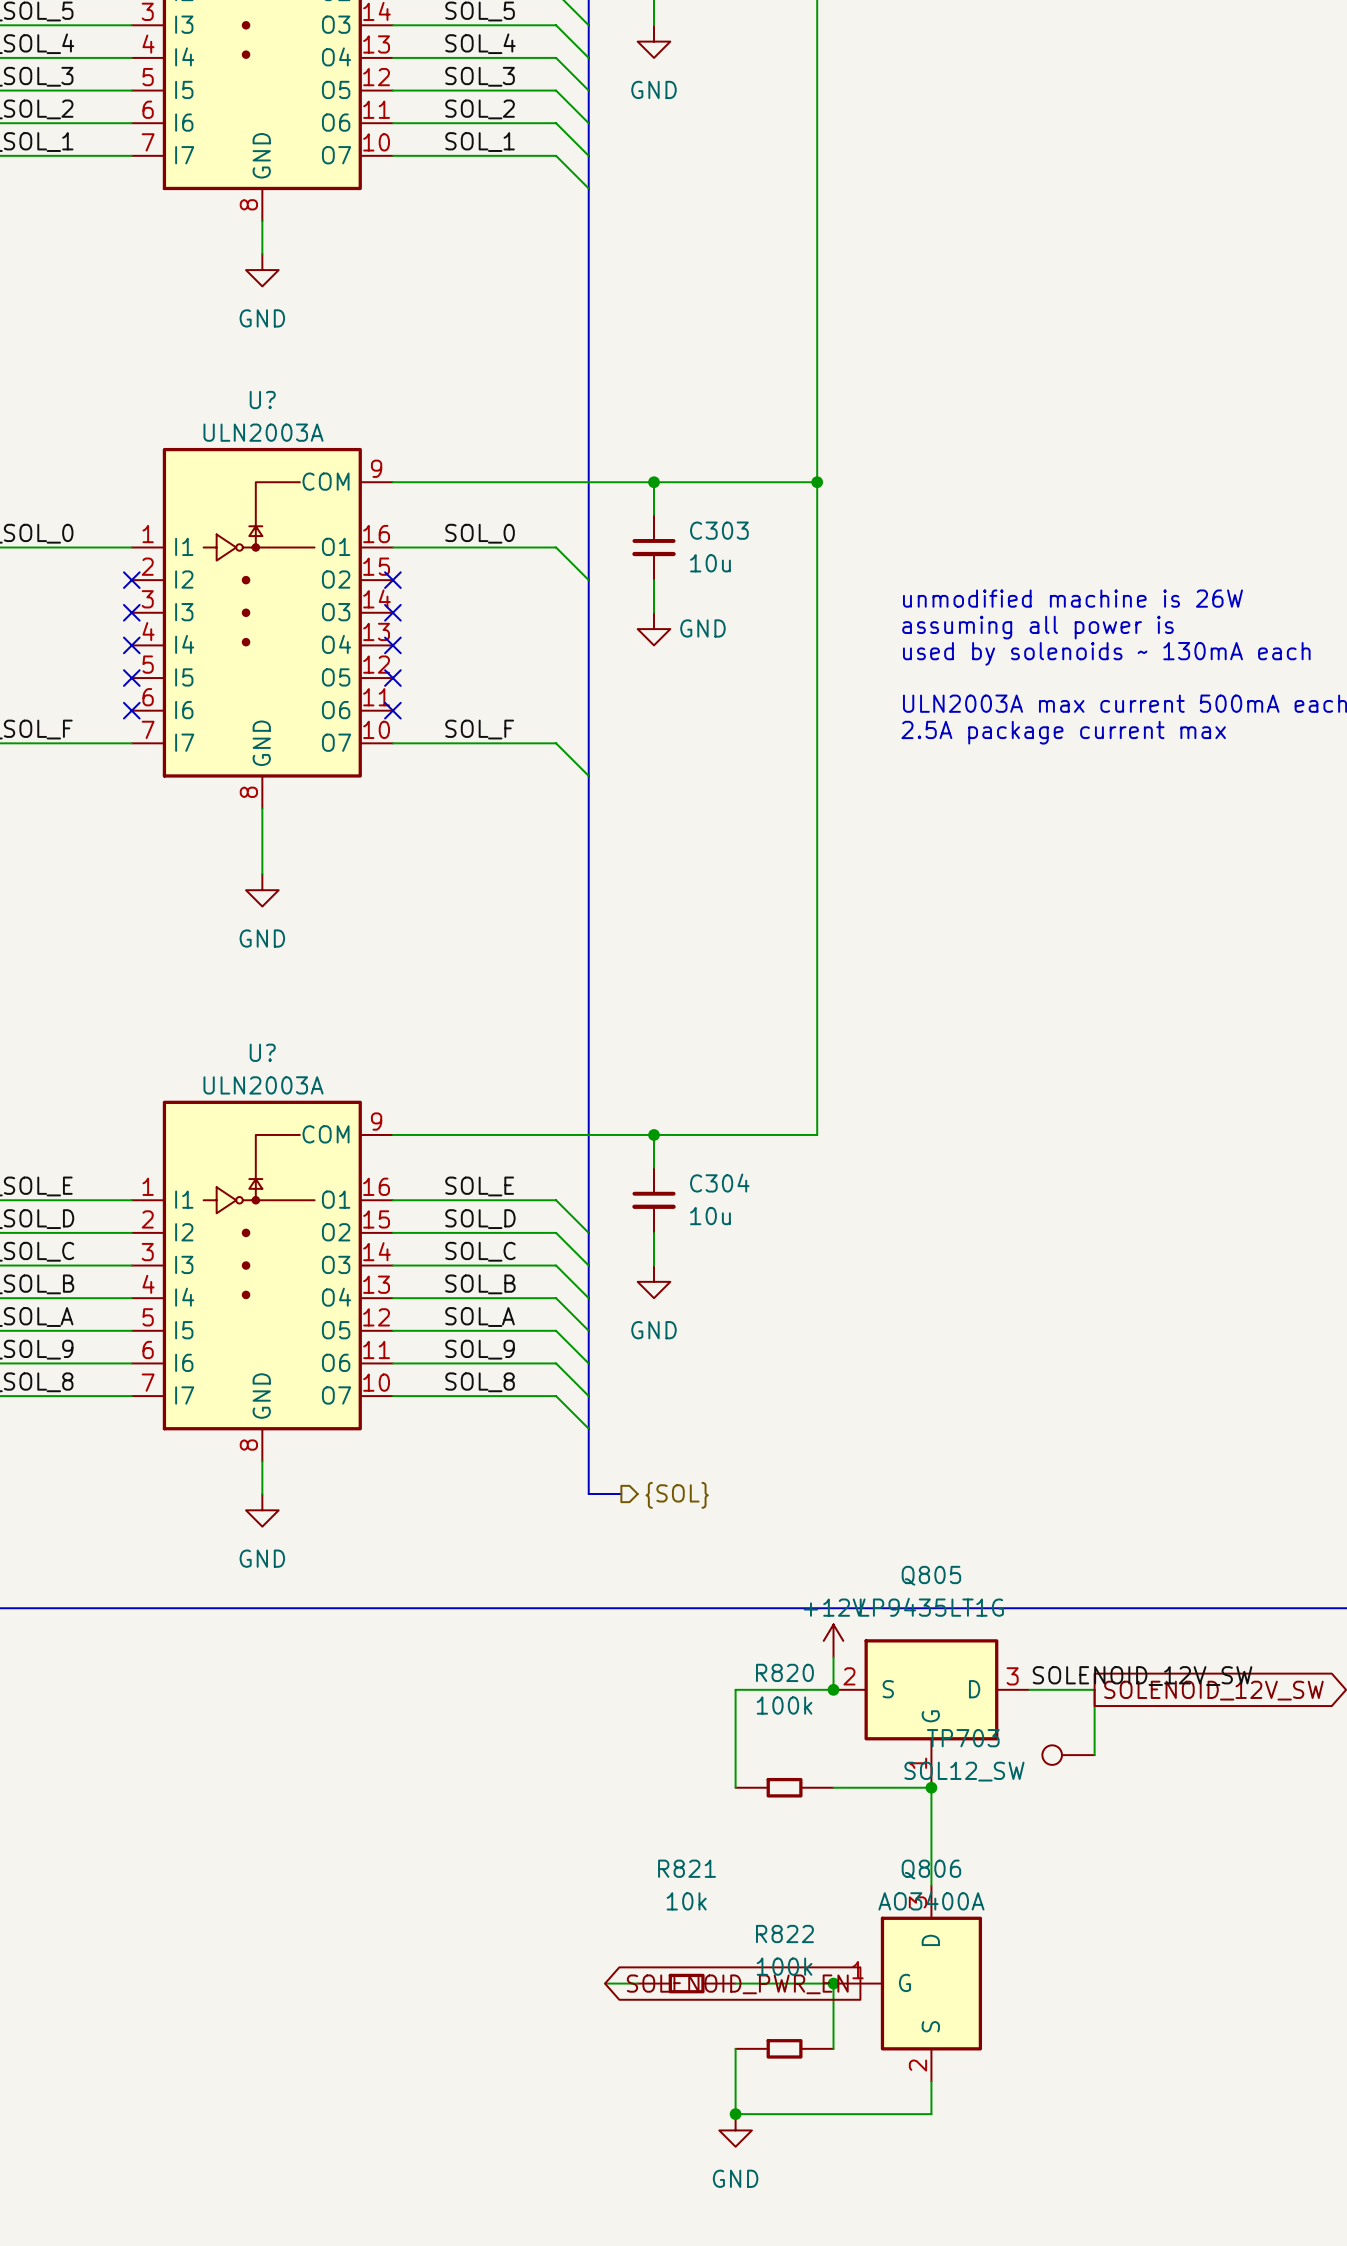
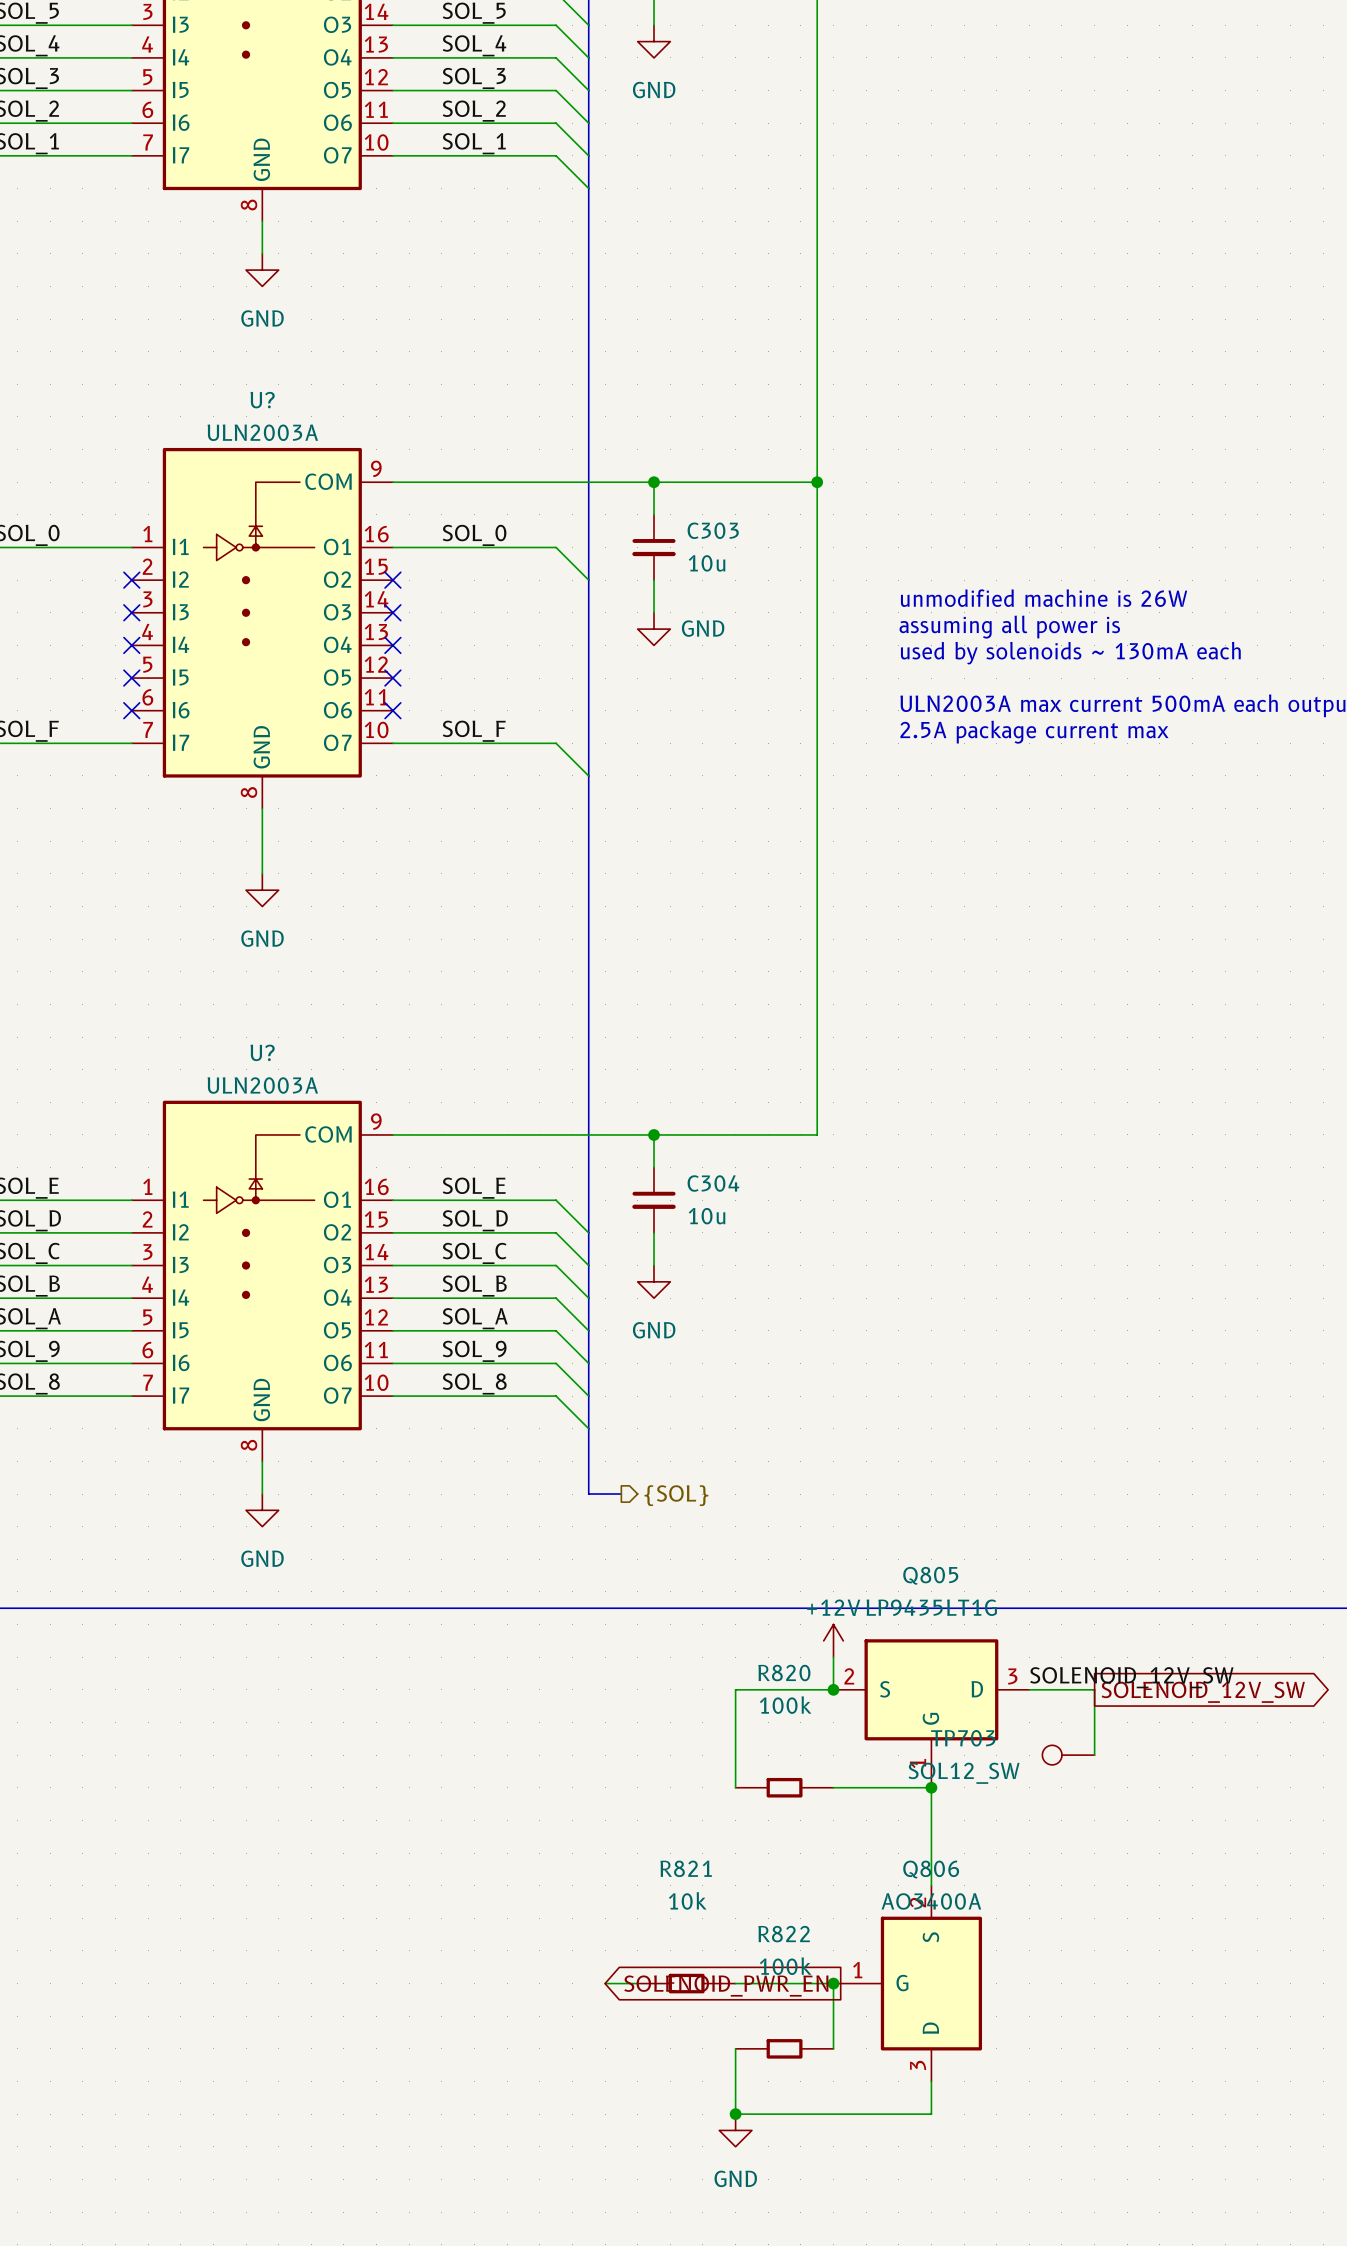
Q806 flip: as is (931, 1983) -> up-down (931, 1983)

